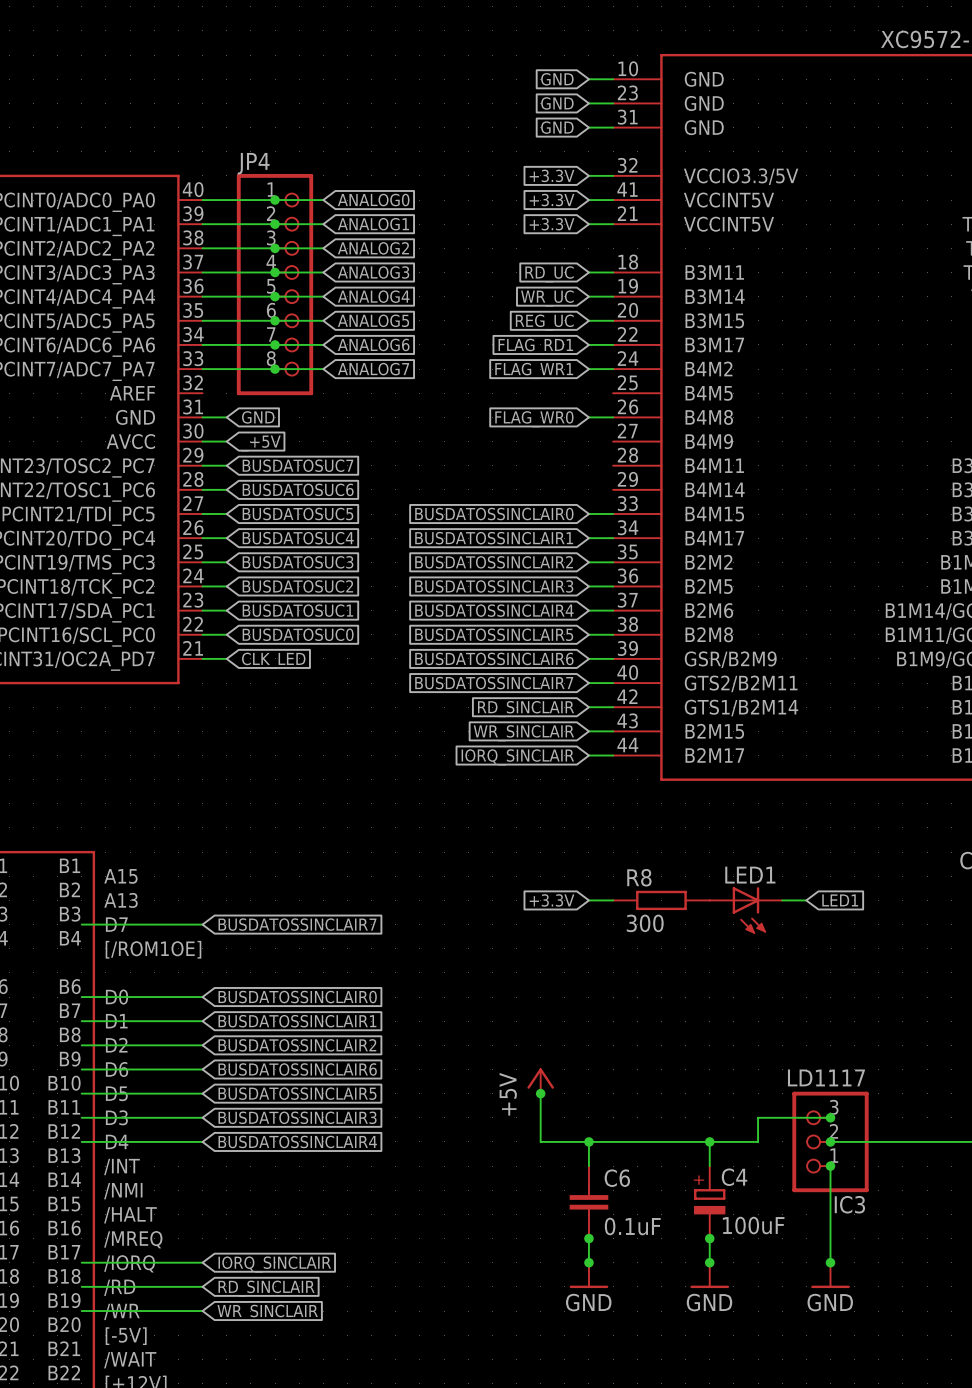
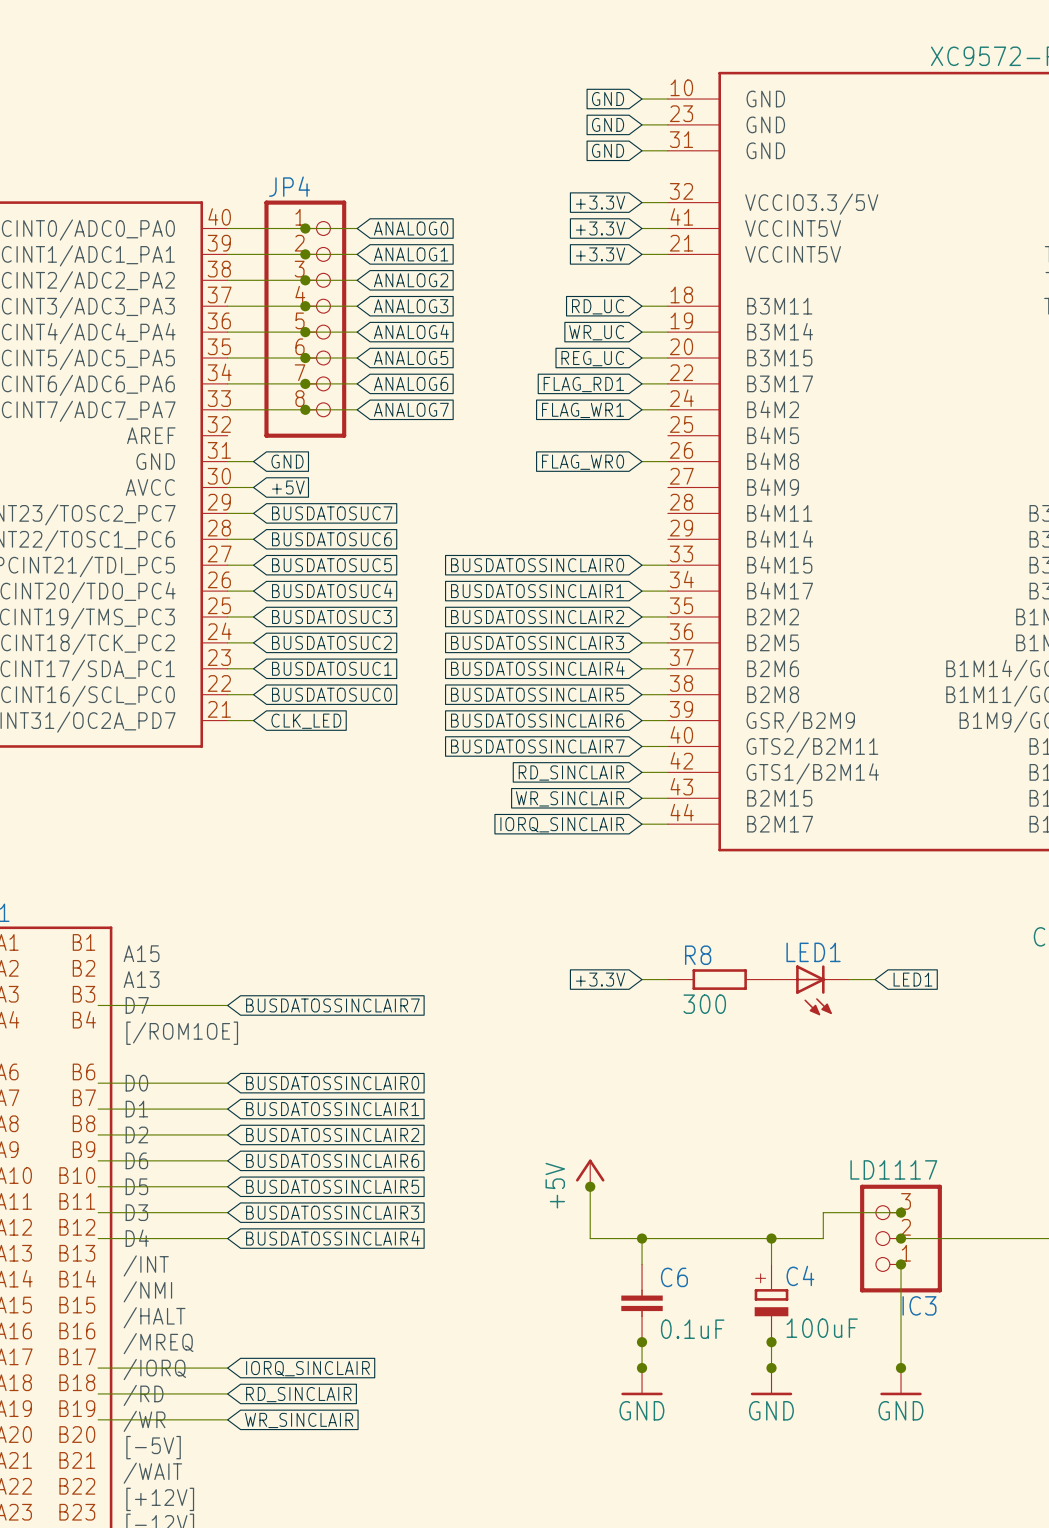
global label: _+5V (260, 443) -> +5V (288, 487)

